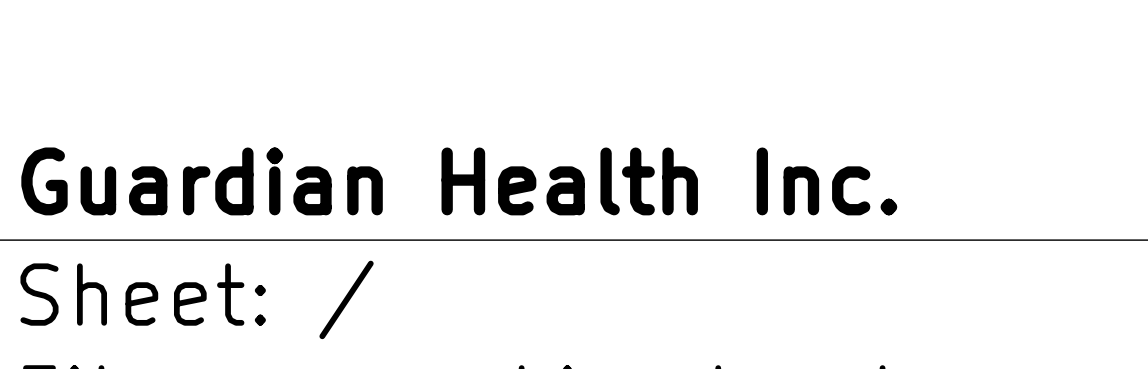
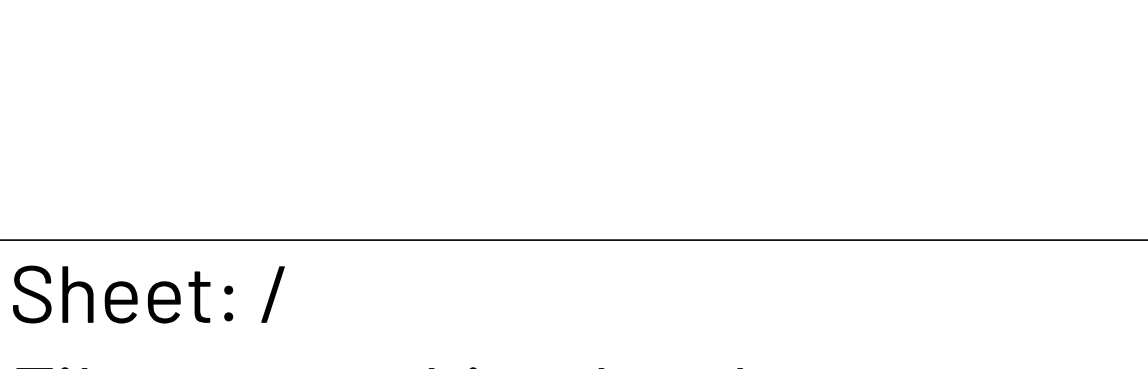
title block: Guardian Health Inc. (459, 181) -> none

